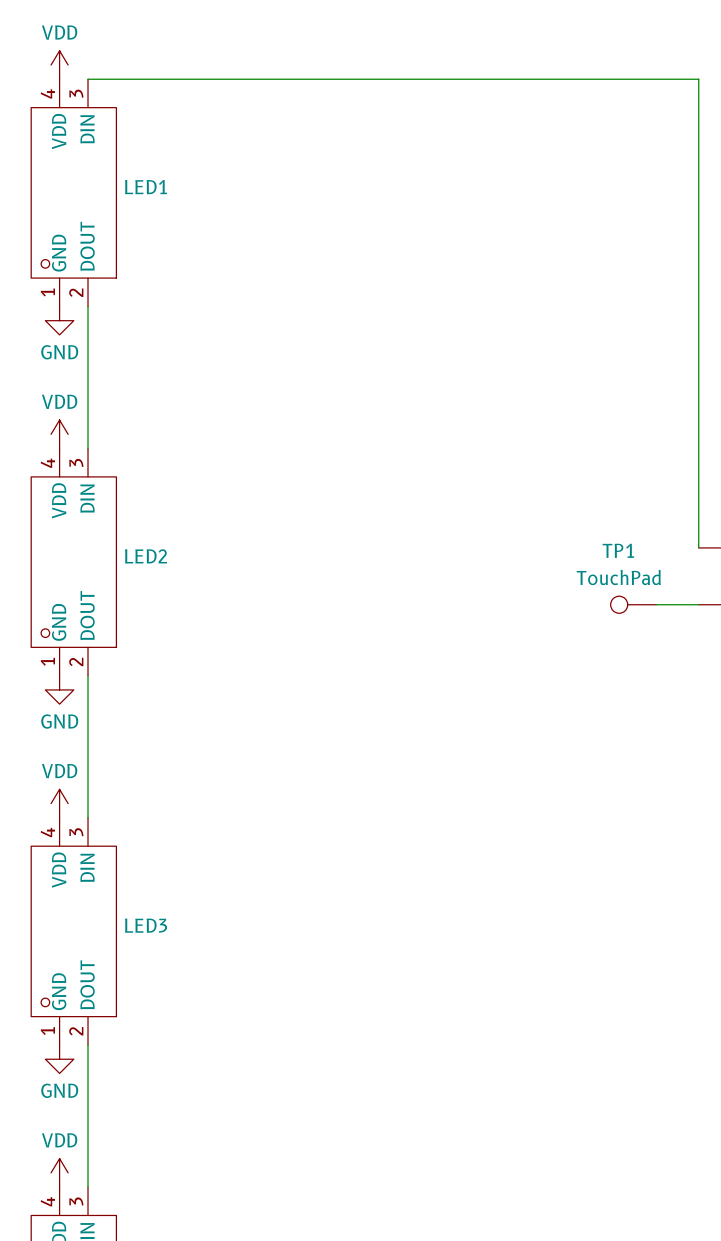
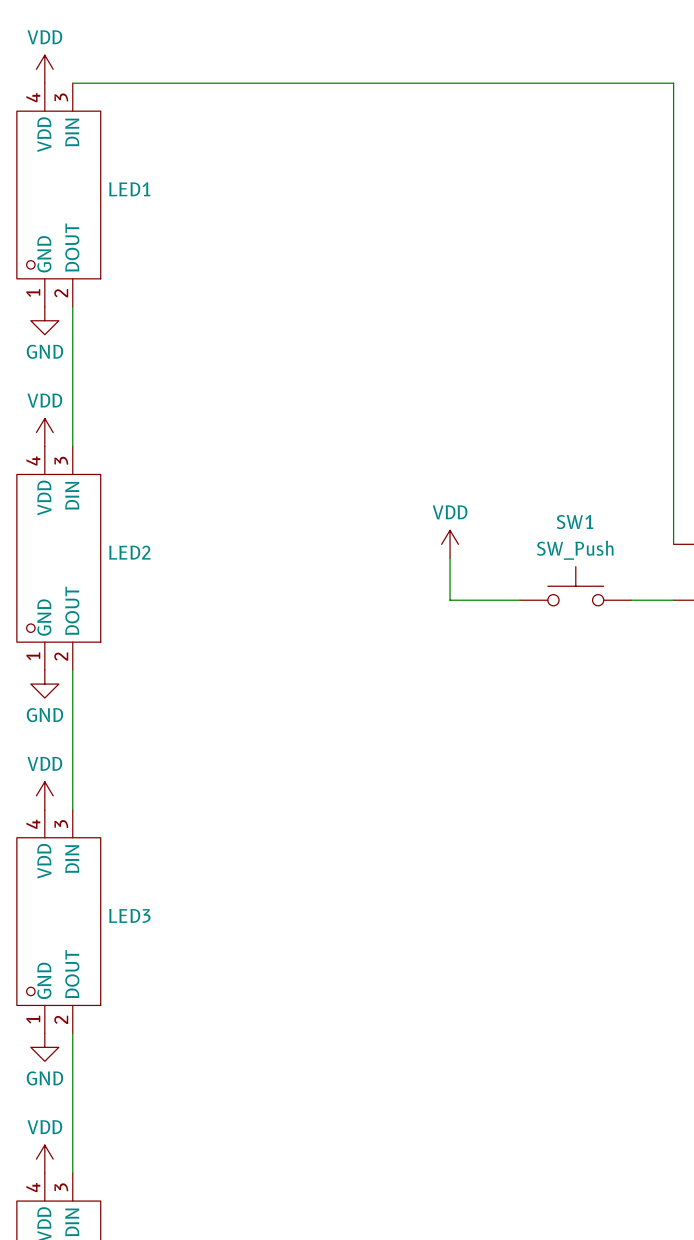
power symbol: none -> VDD (450, 544)
wire: none -> (450, 558) (450, 600) (519, 600)
SW1: none -> SW_Push (575, 586)
TP1: TouchPad (633, 604) -> none

